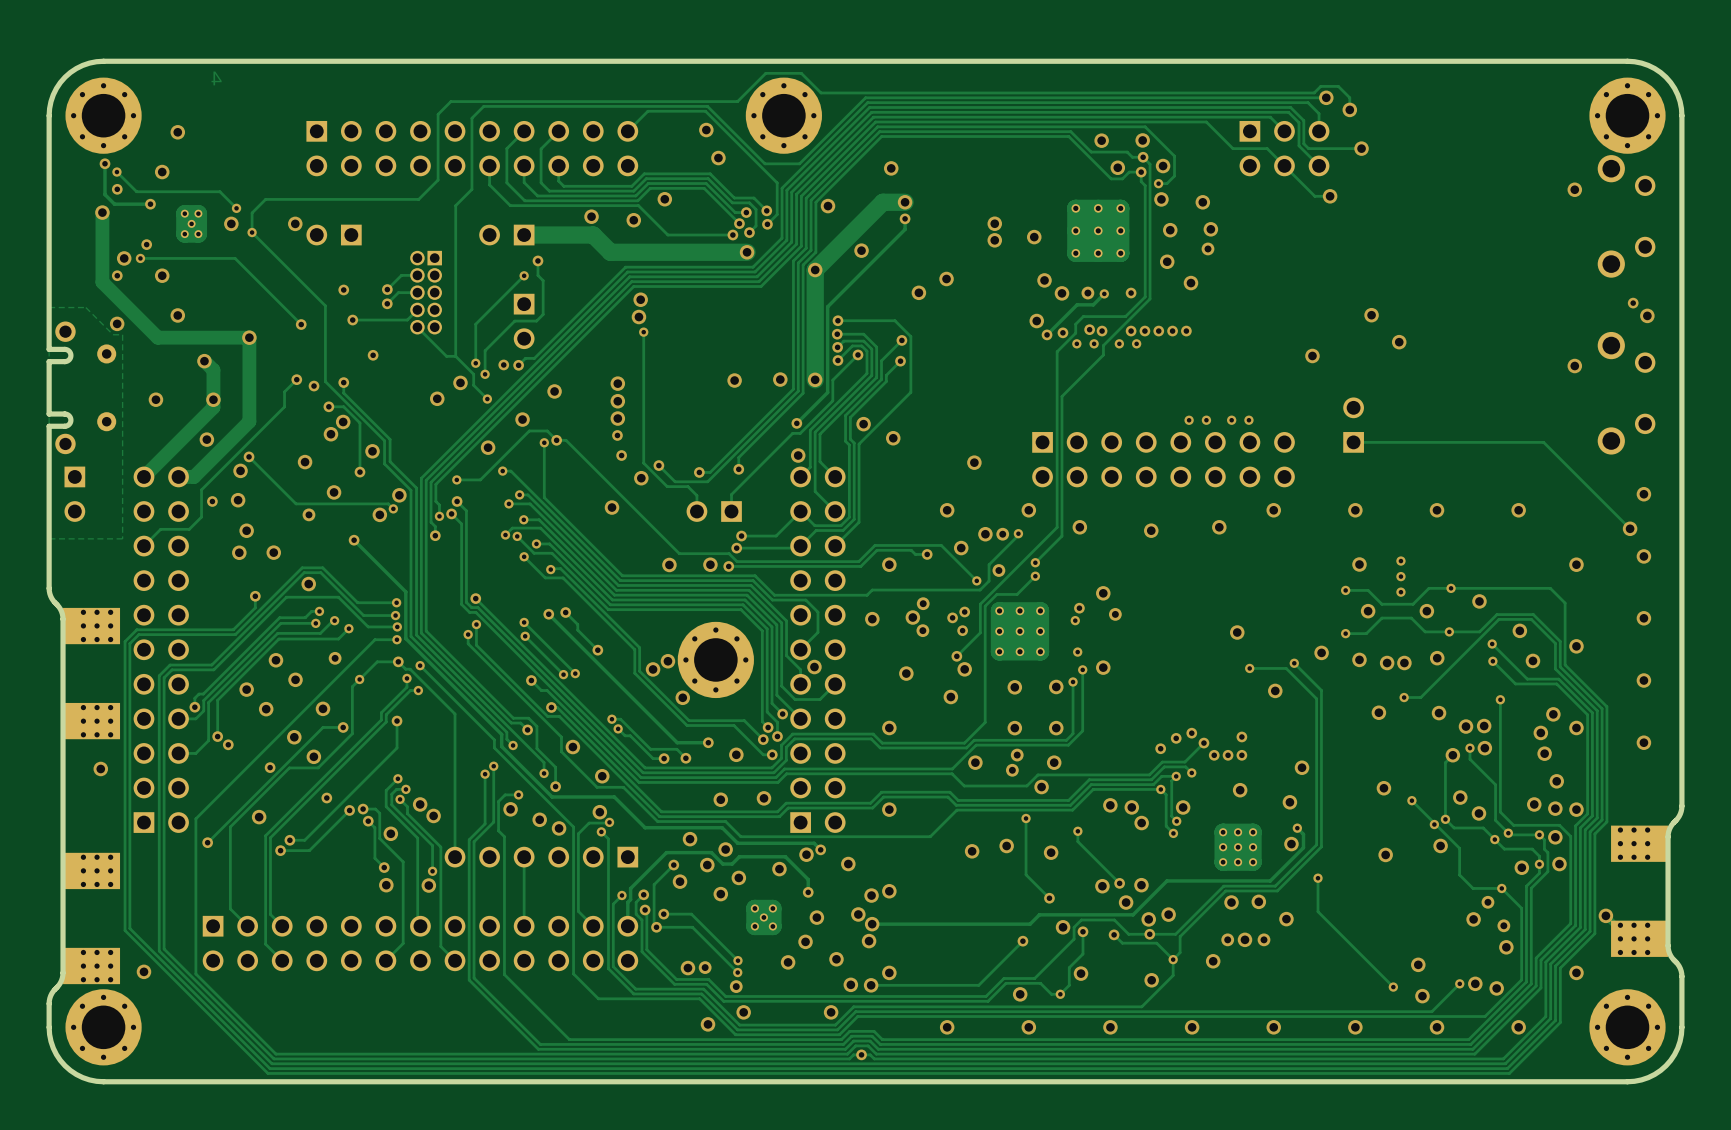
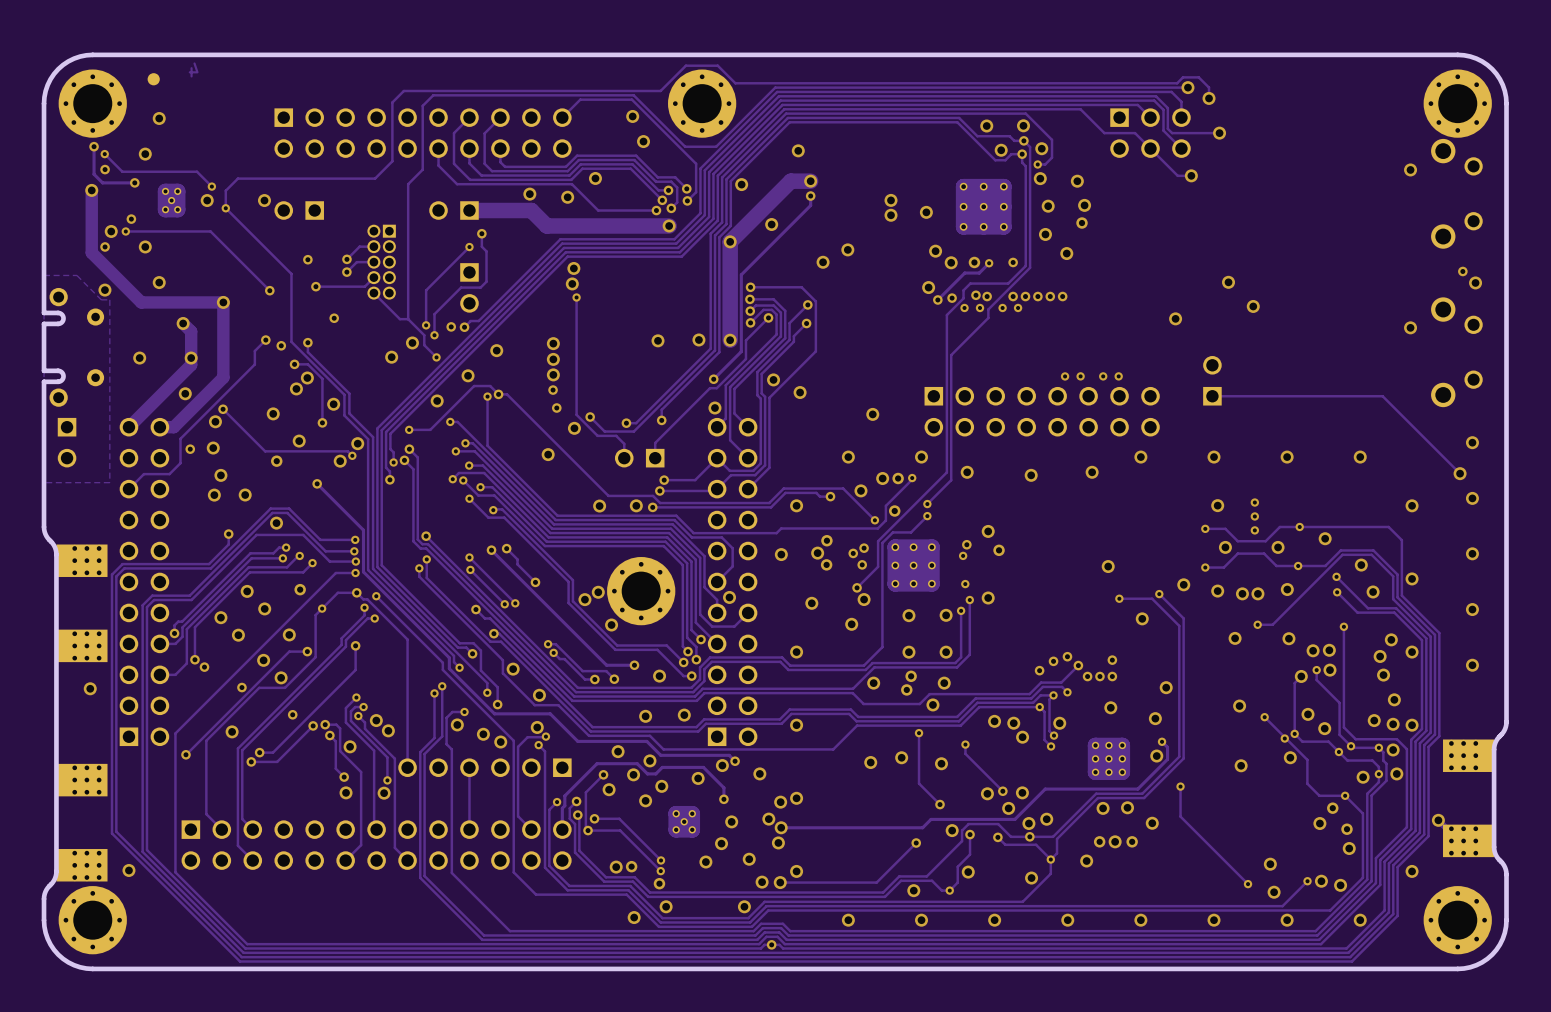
part: none -> (153, 79)

